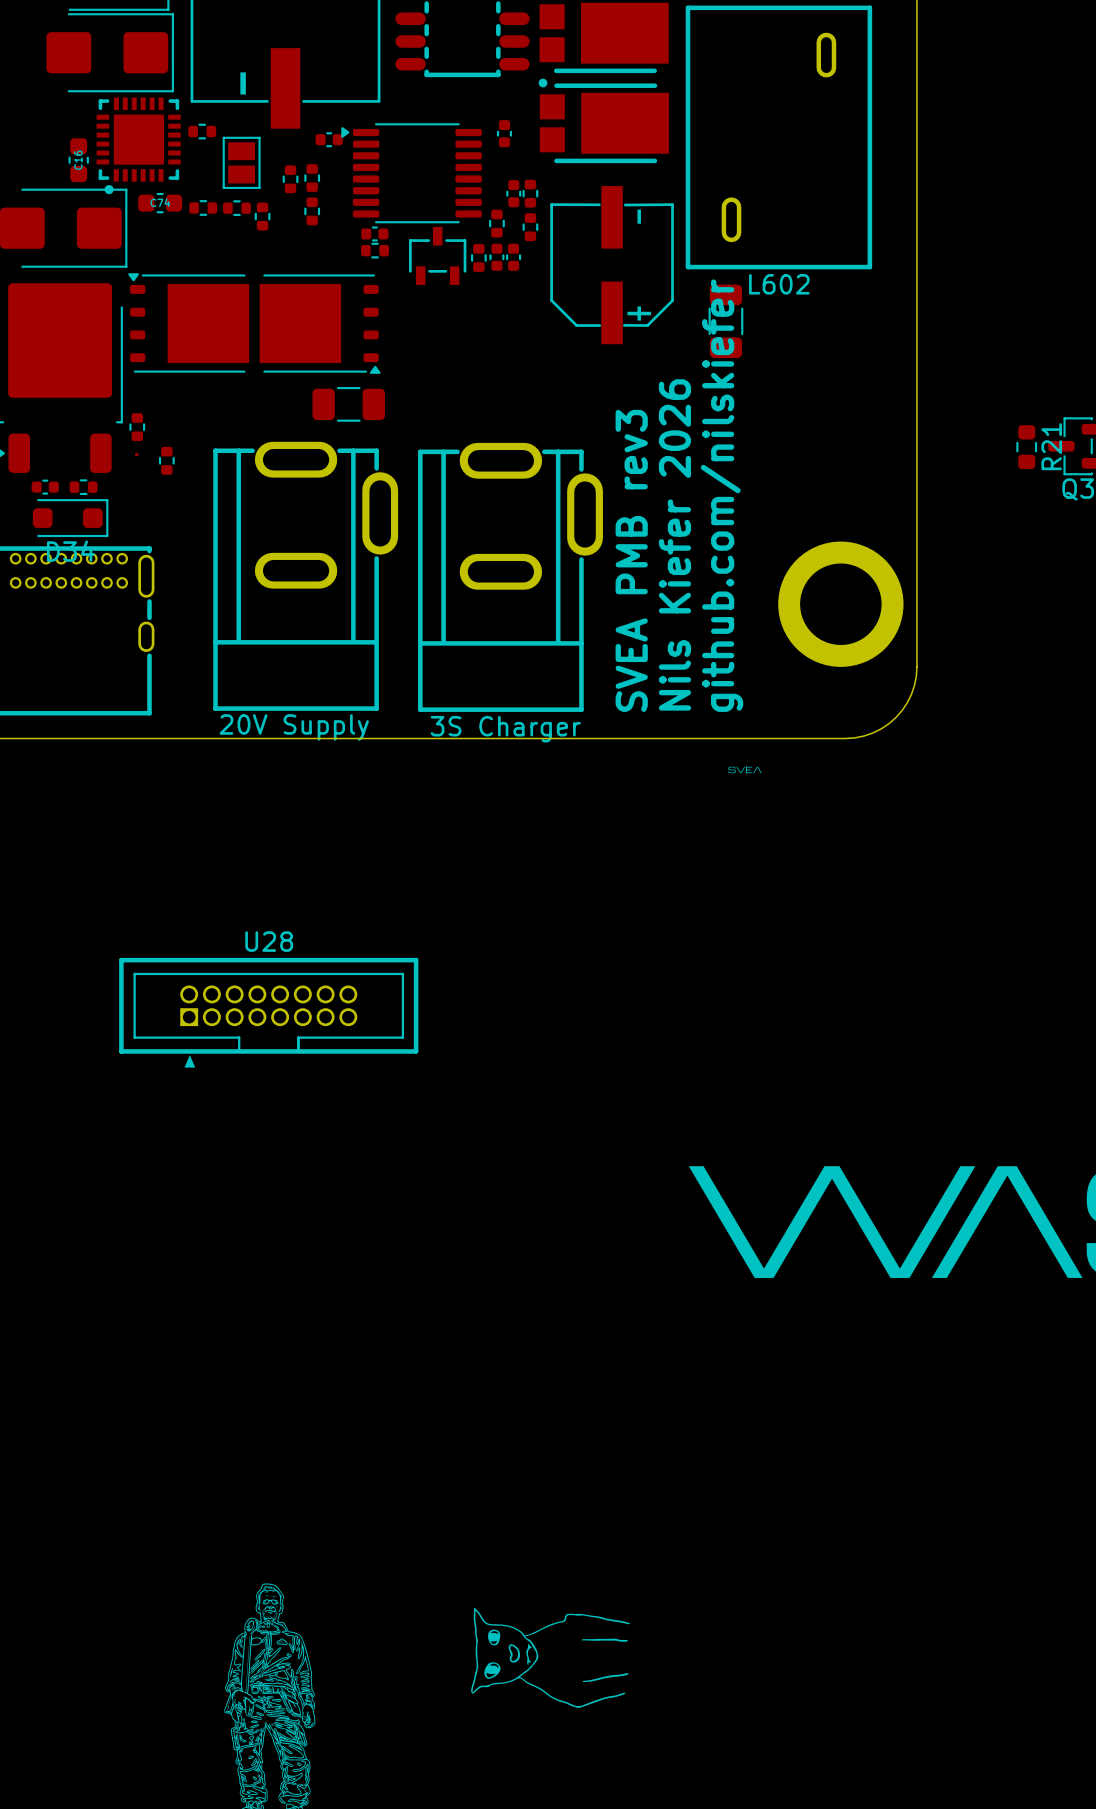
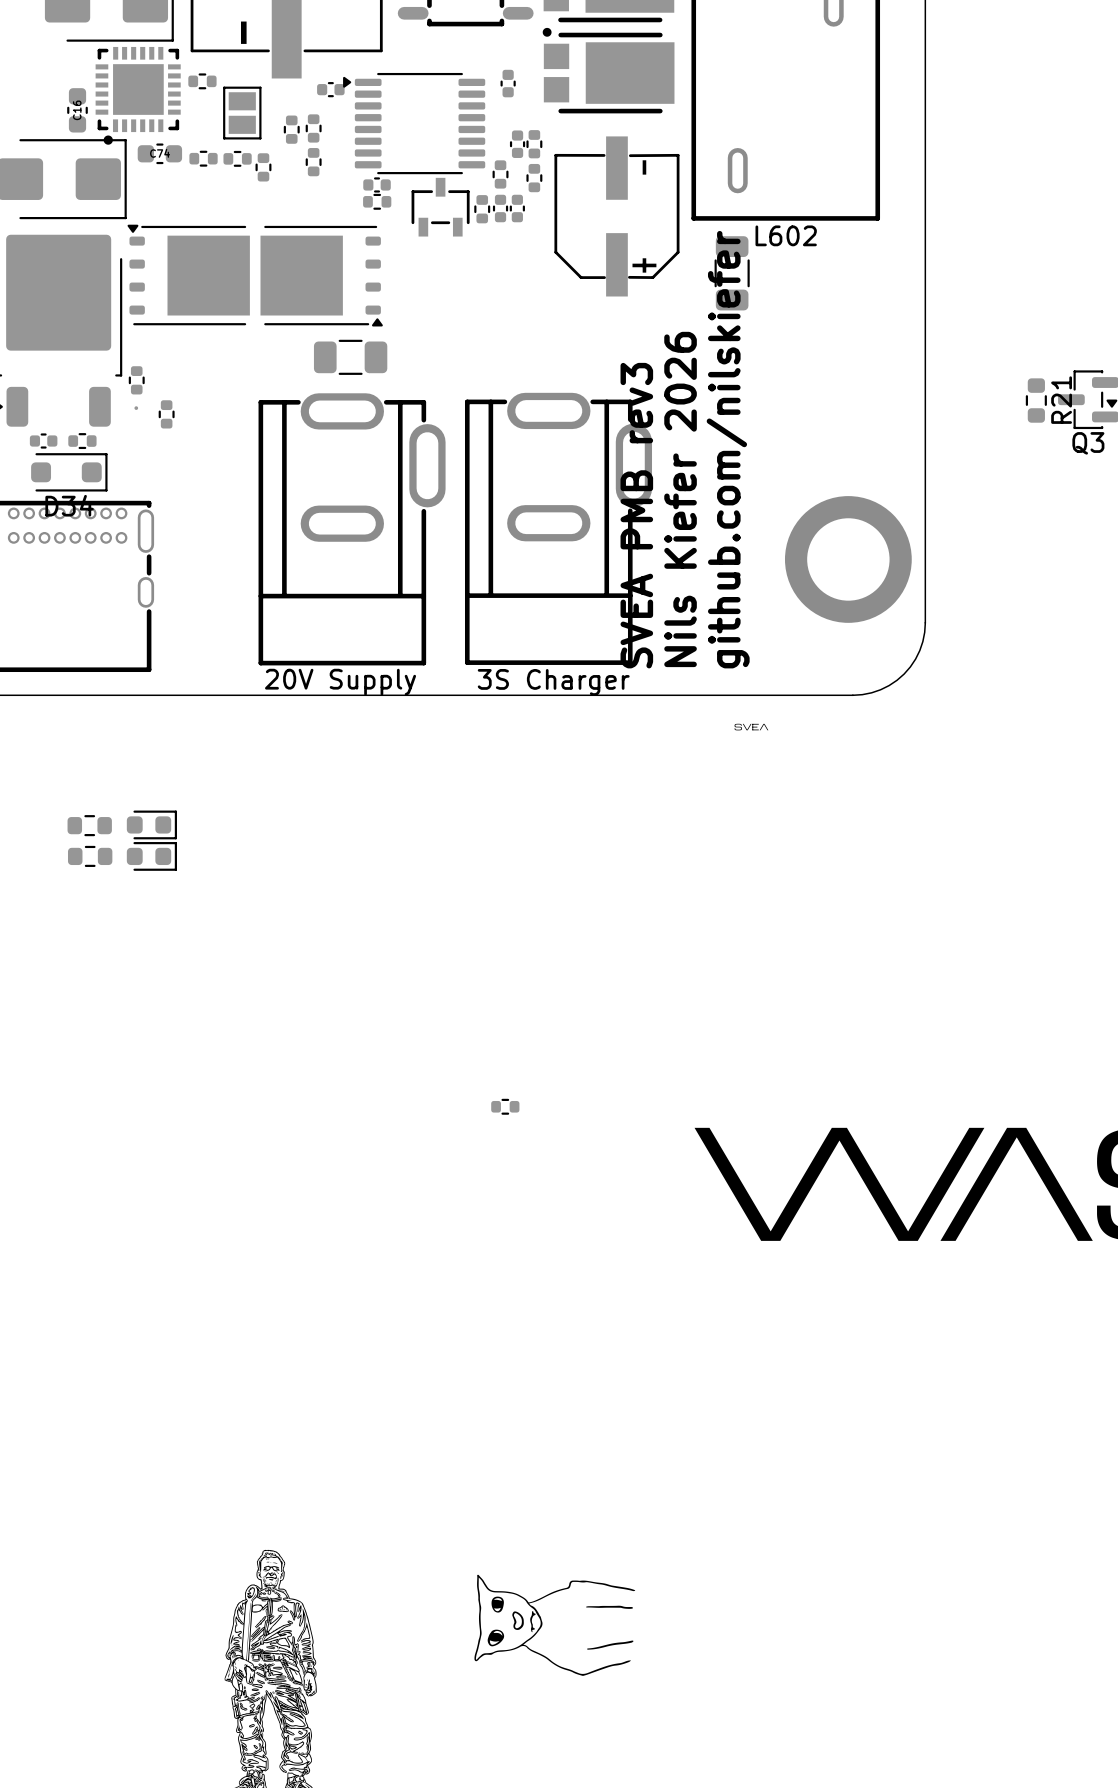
part position: (305, 576) -> (352, 529)
part position: (510, 577) -> (558, 528)
part: none -> (151, 824)
part: none -> (89, 825)
part: none -> (90, 856)
part: none -> (151, 856)
U28: (268, 1012) -> none
part: none -> (505, 1106)

